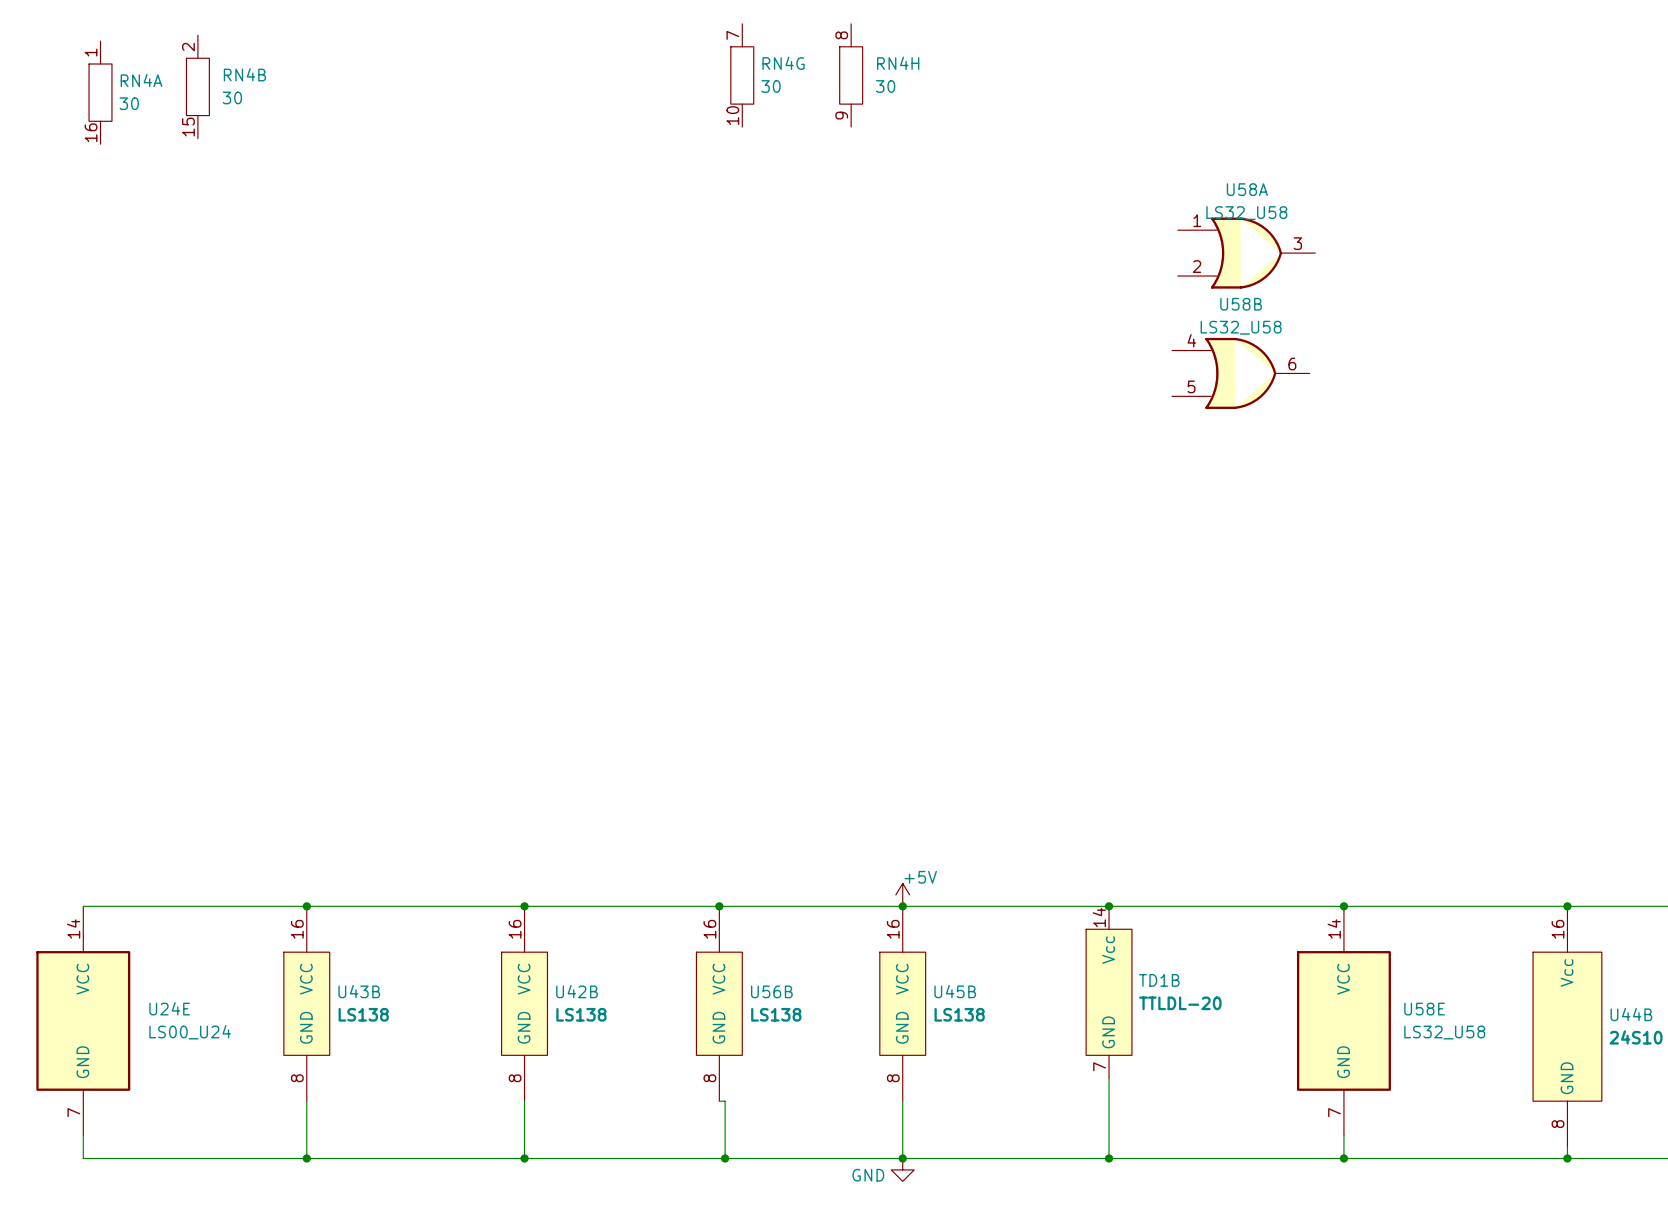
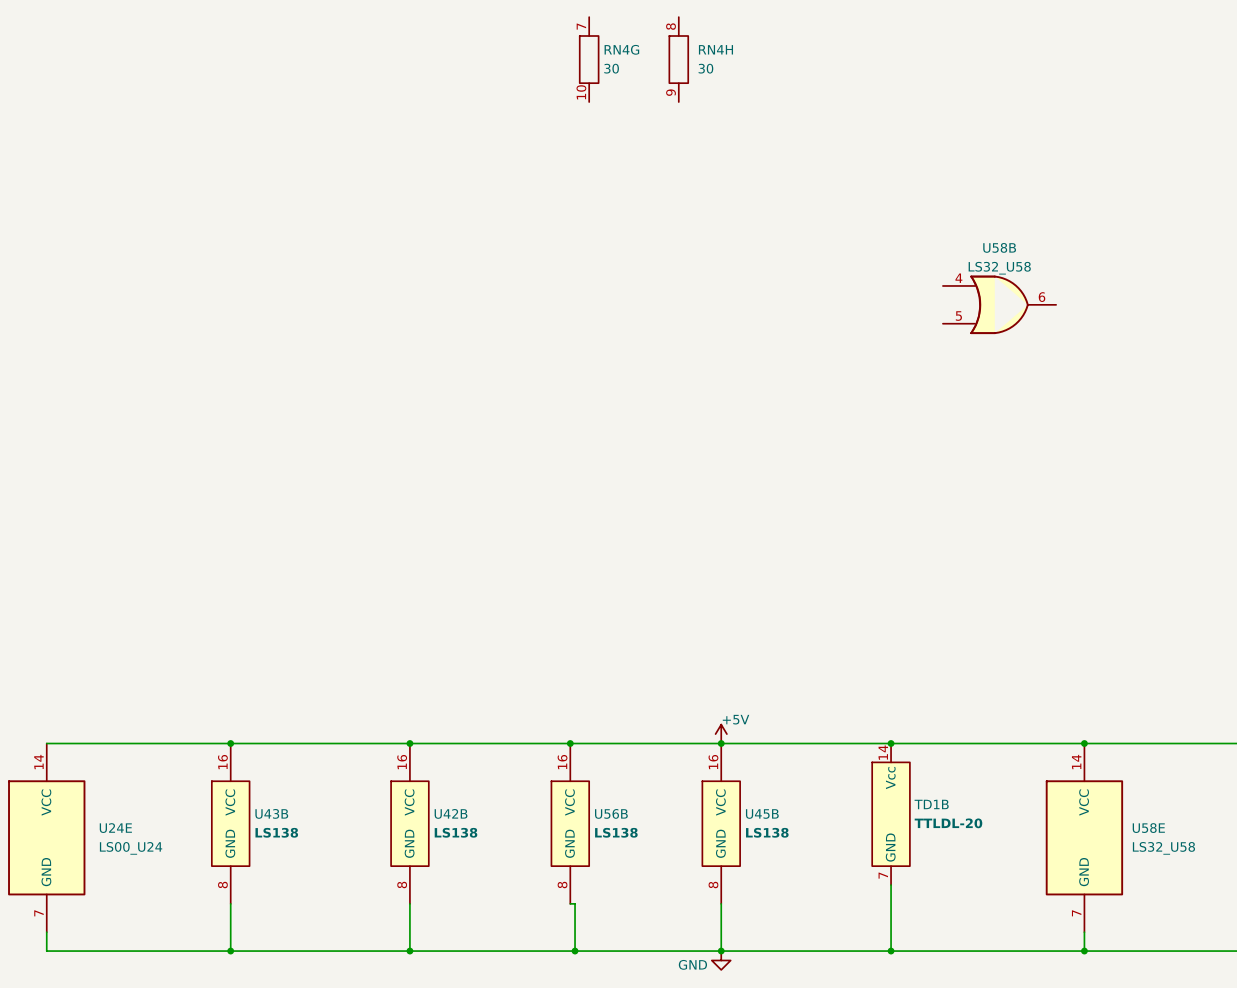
RN4B: 30 (197, 86) -> none
RN4A: 30 (100, 92) -> none
U58A: LS32_U58 (1246, 253) -> none

